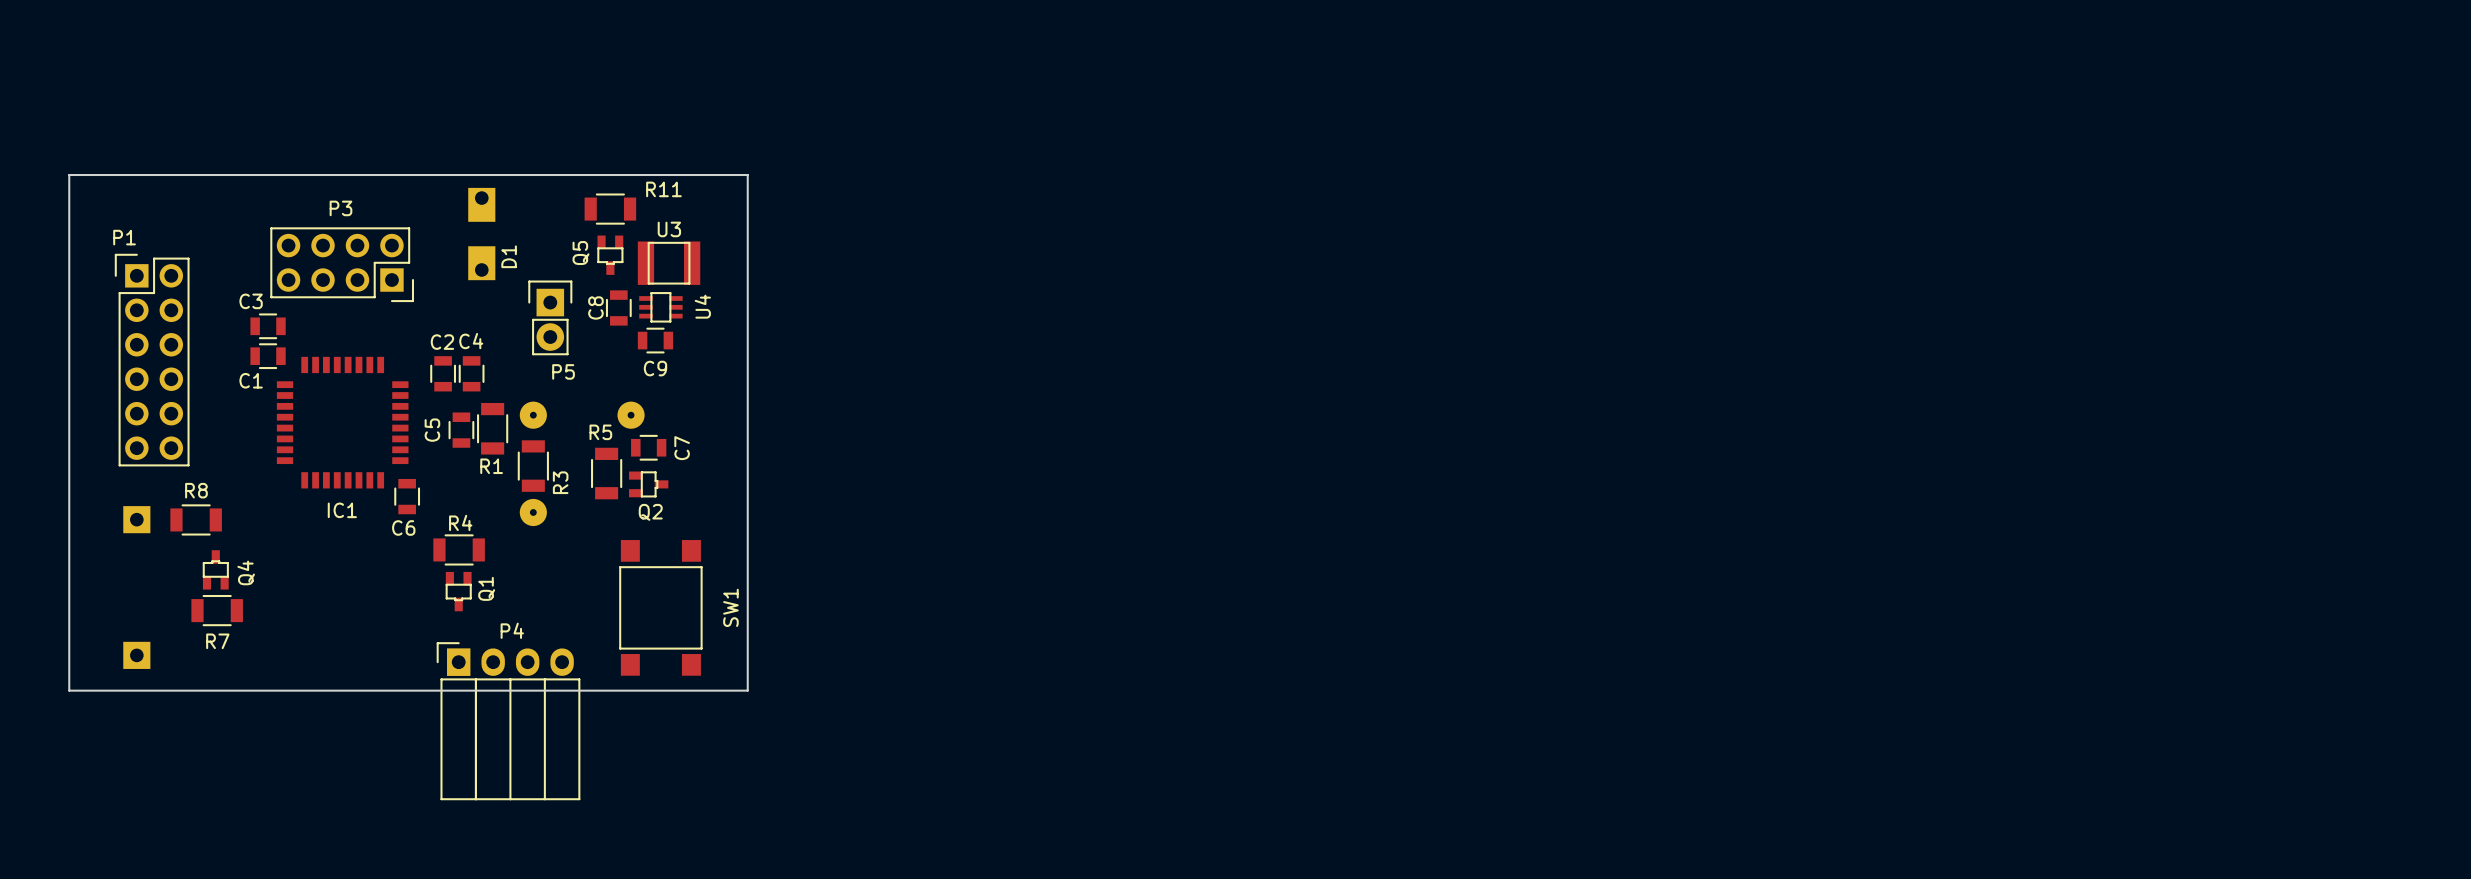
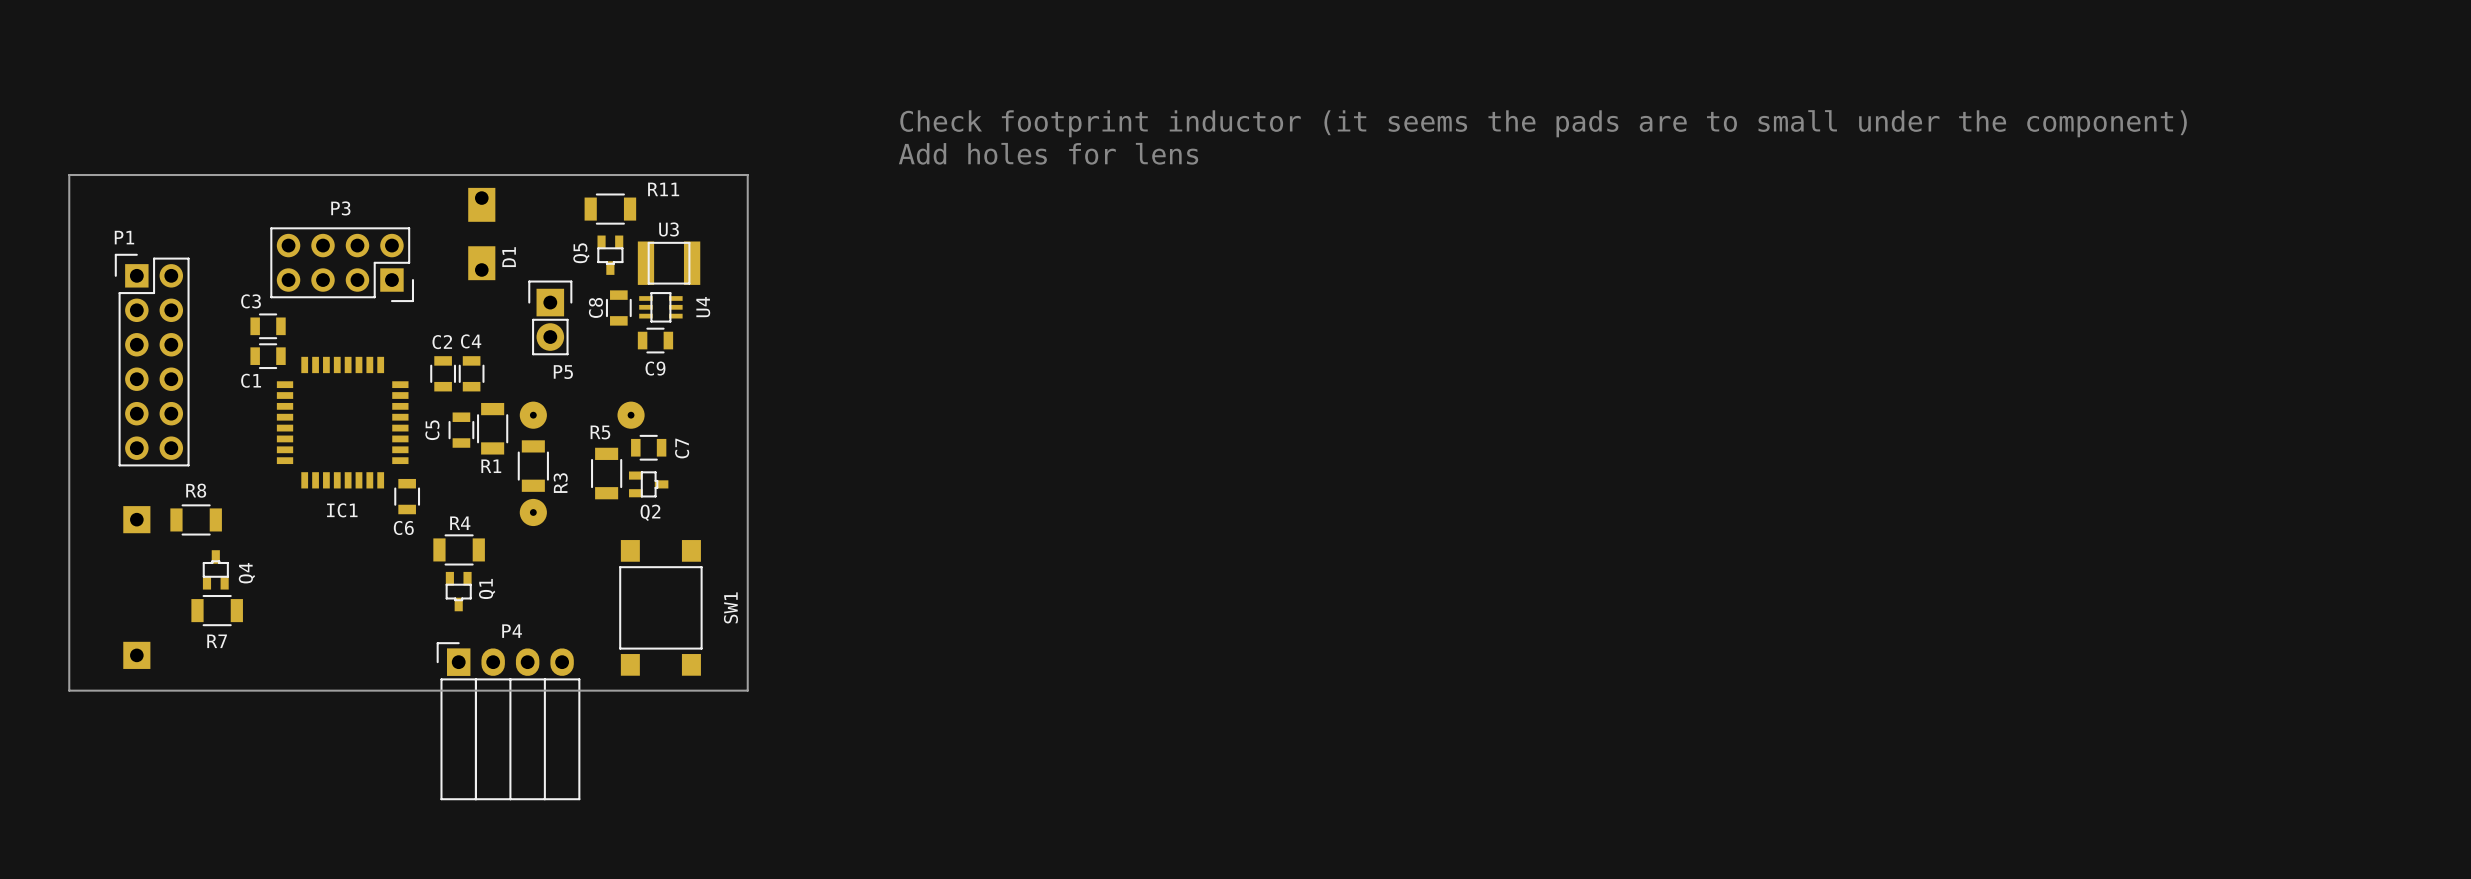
text: none -> Check footprint inductor (it seems the pads are to small under the component) (1543, 123)
text: none -> Add holes for lens (1048, 153)

